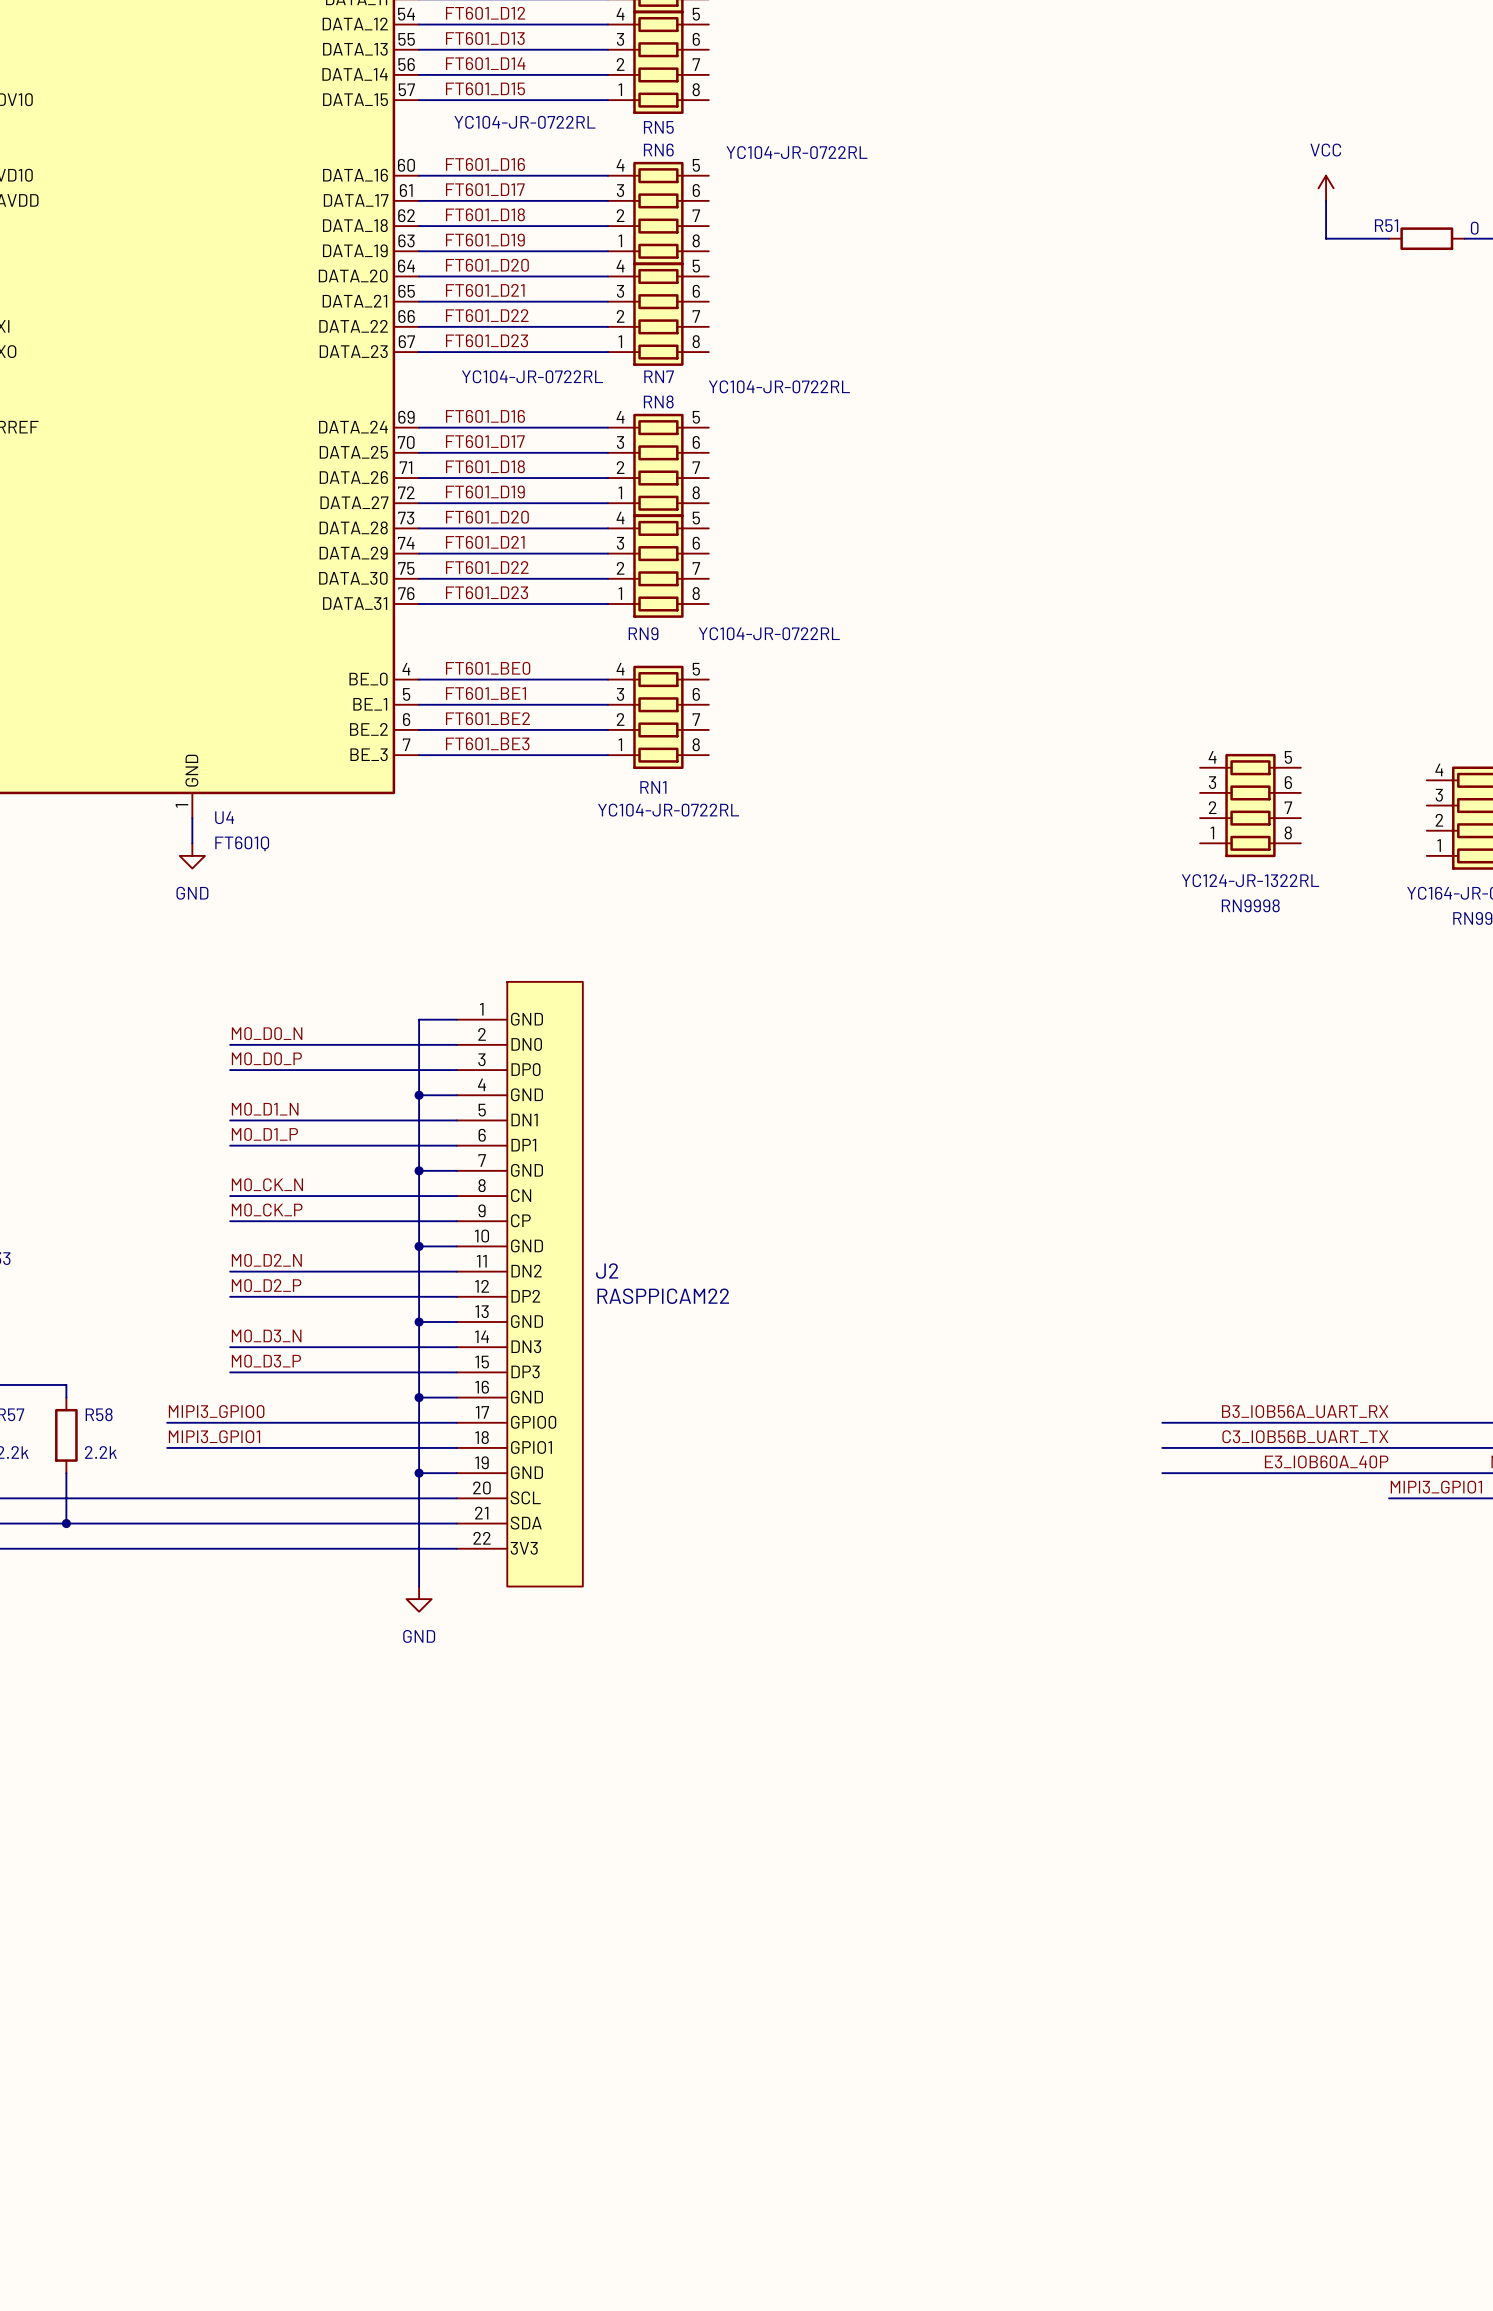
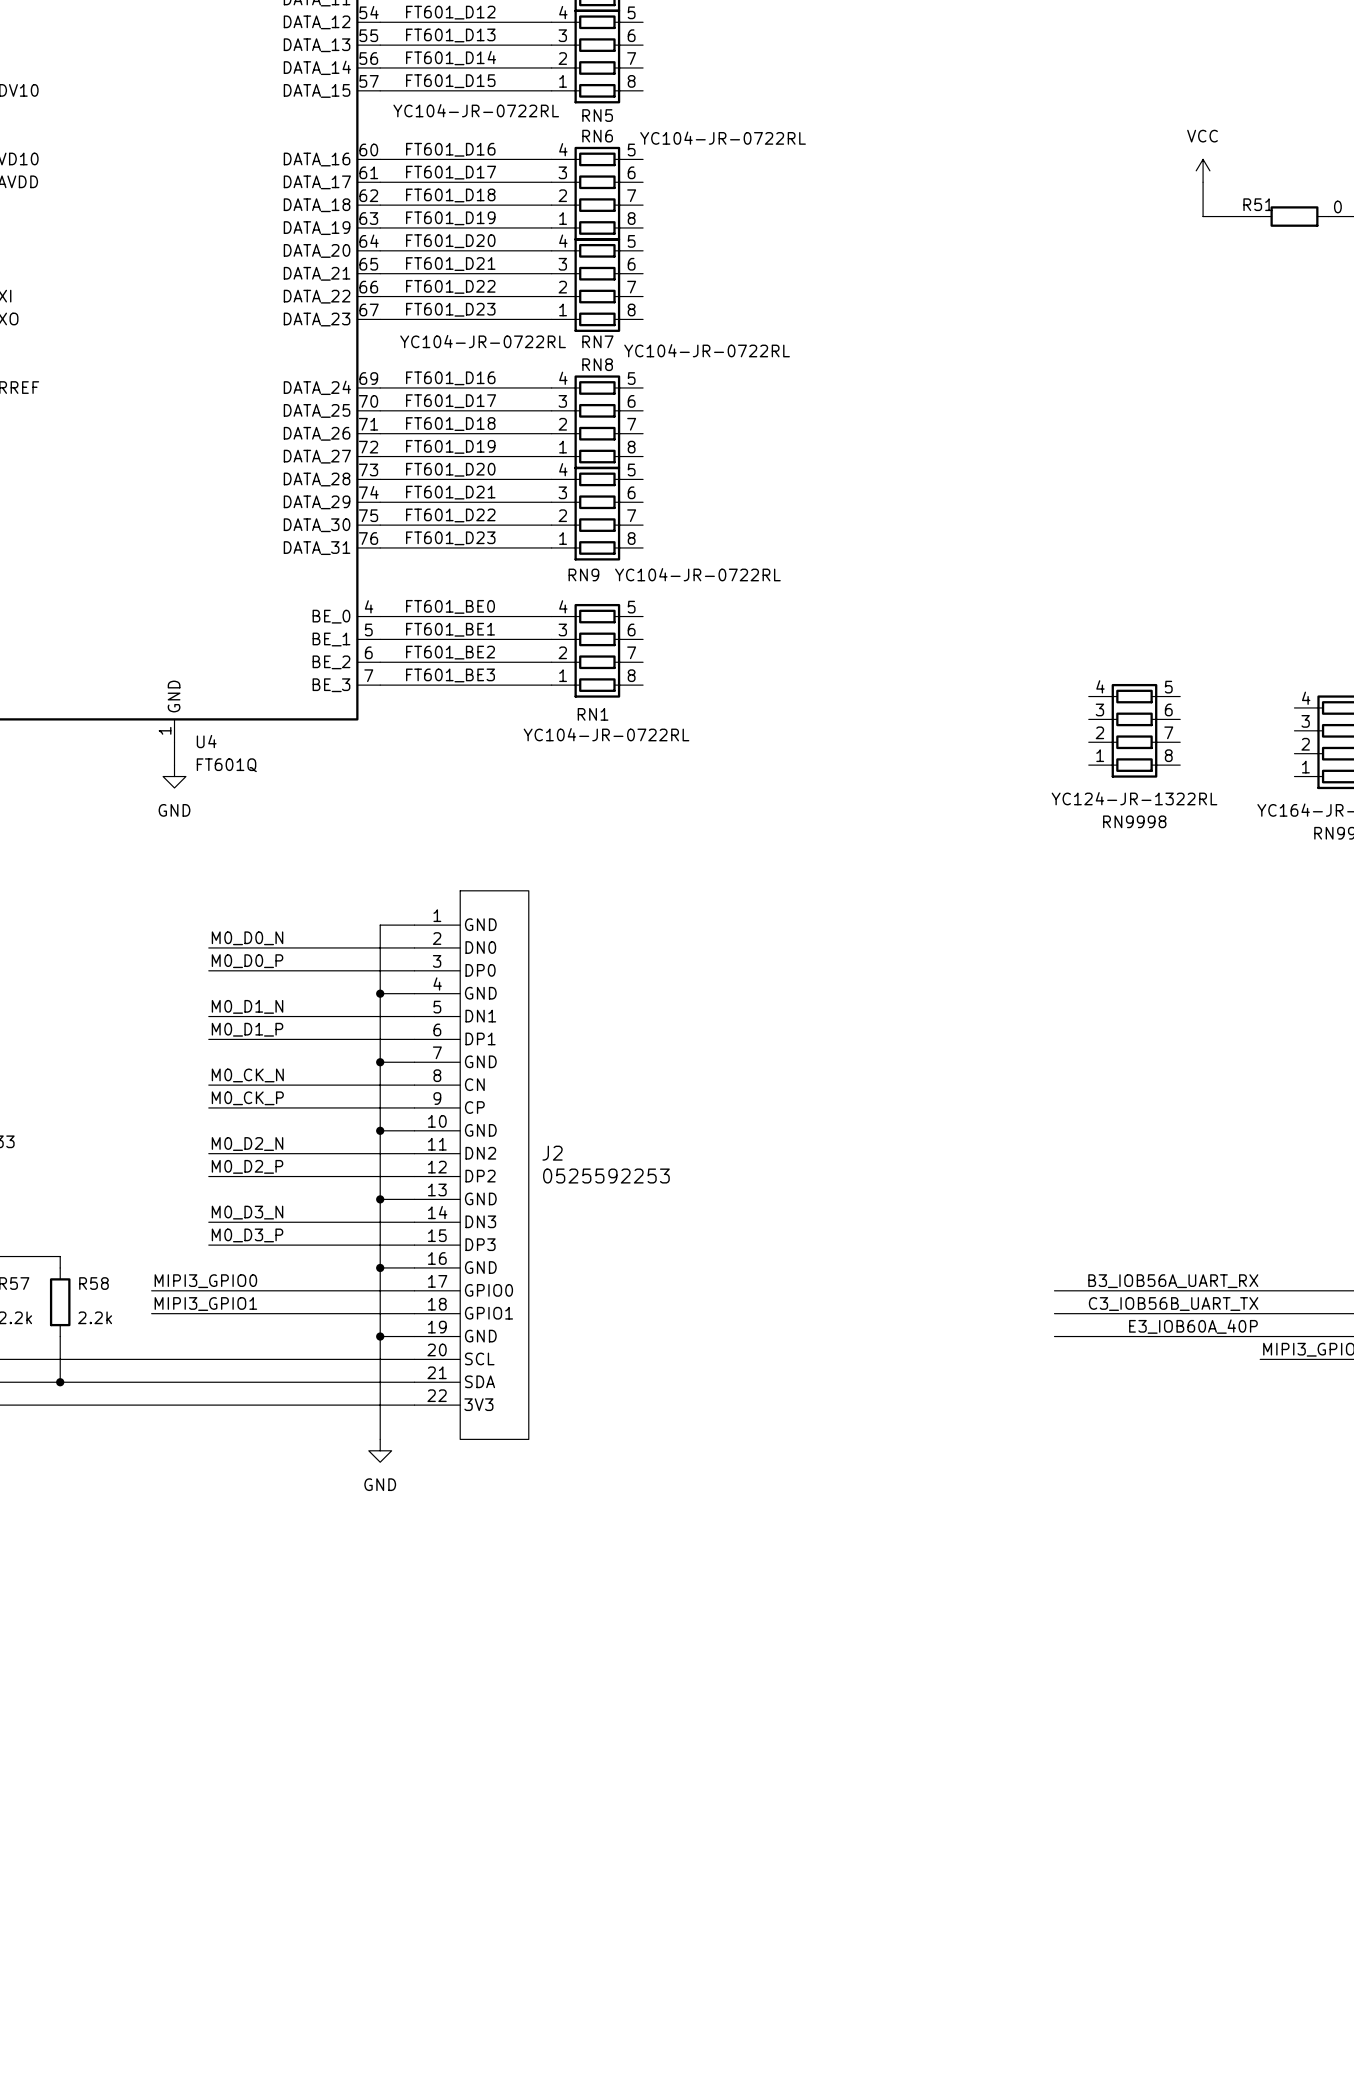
J2 value: RASPPICAM22 (663, 1296) -> 0525592253 (606, 1176)

